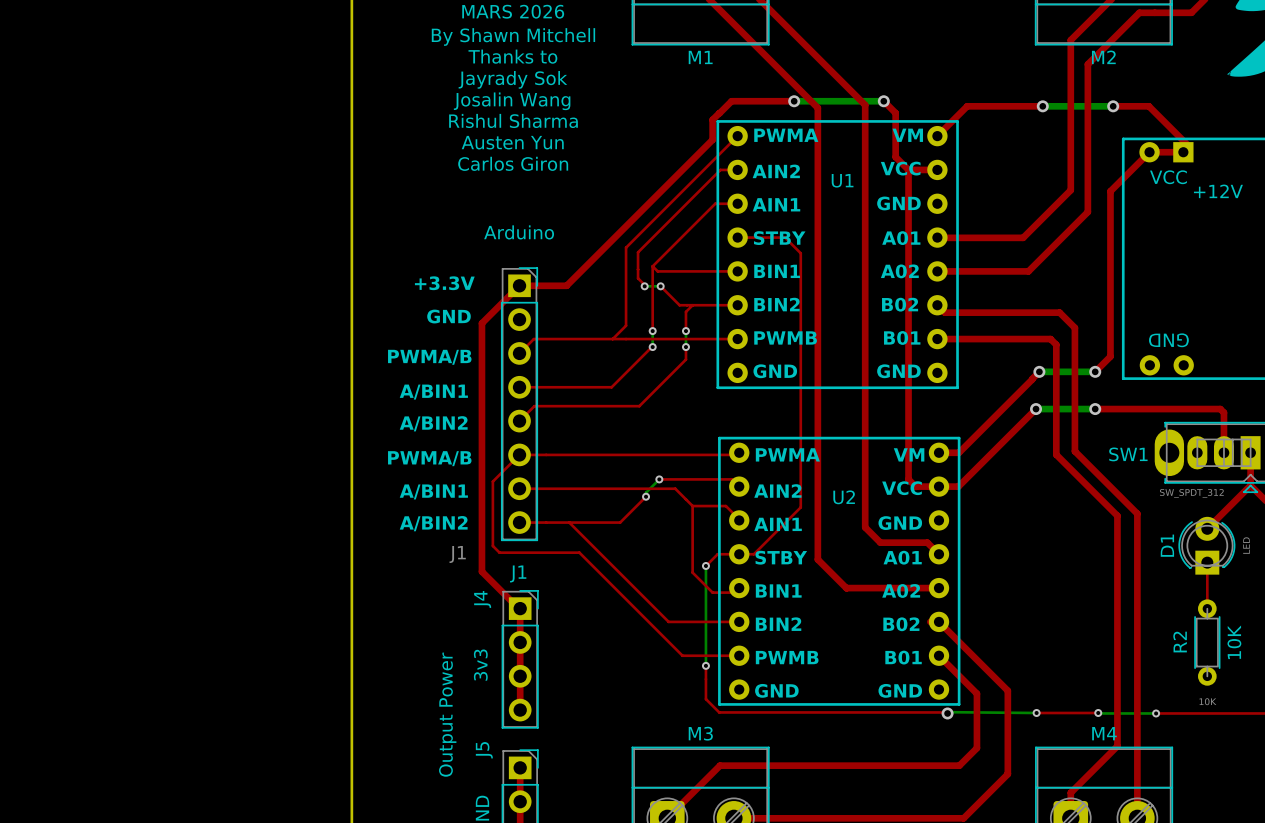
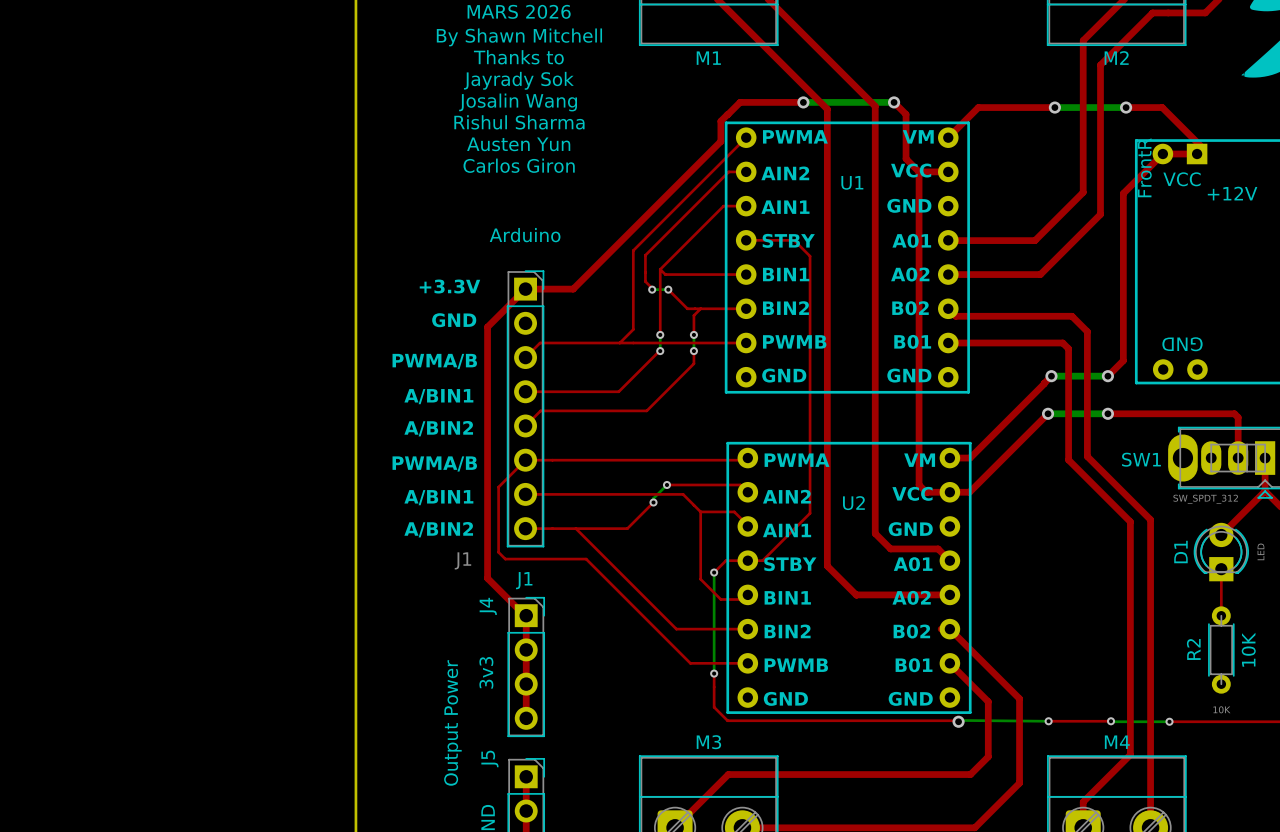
text: none -> FrontR (1144, 167)
D1 footprint: [1178, 516, 1236, 575] -> [1193, 522, 1249, 582]

